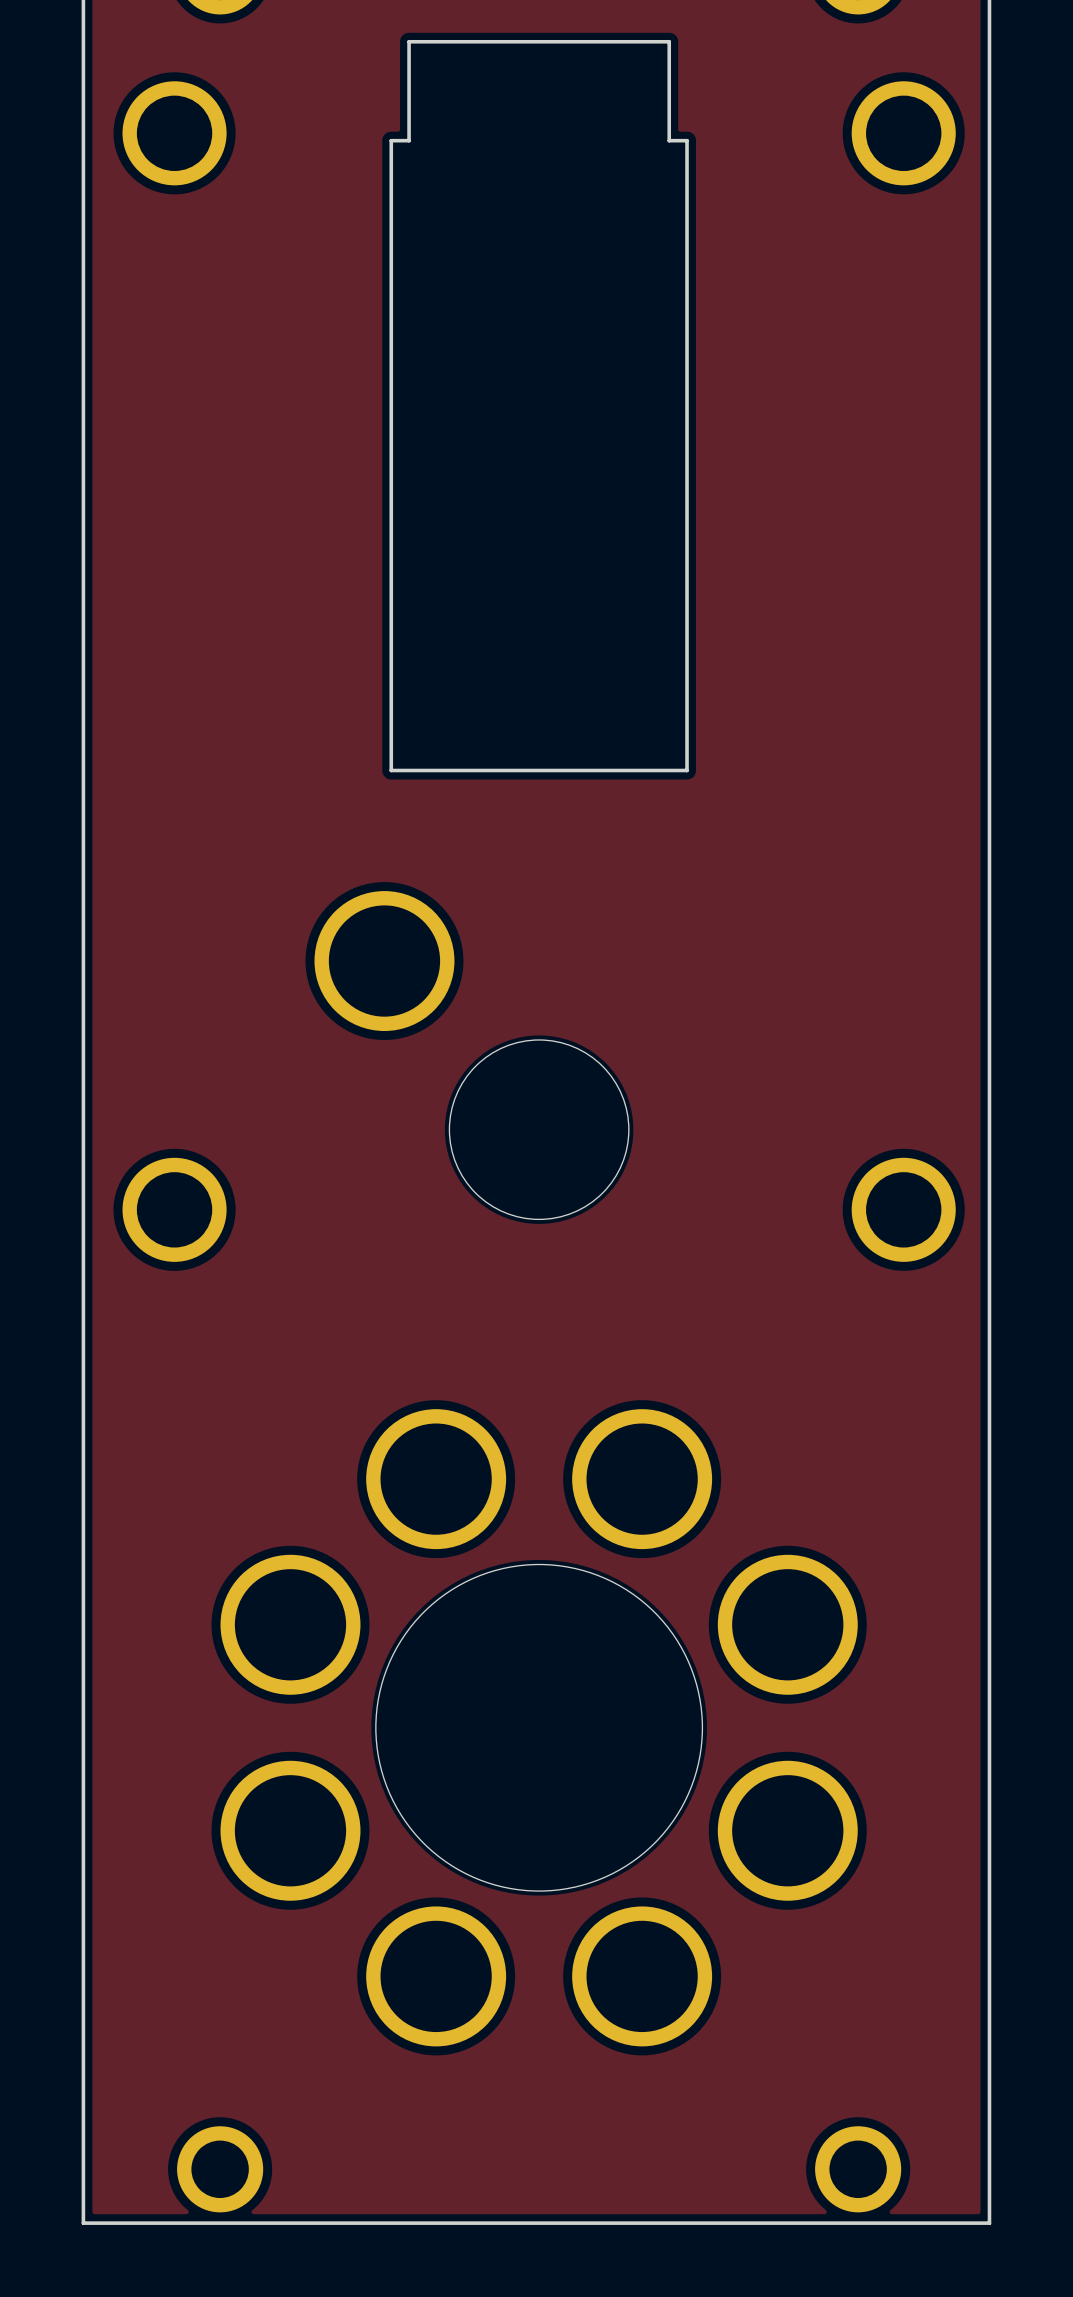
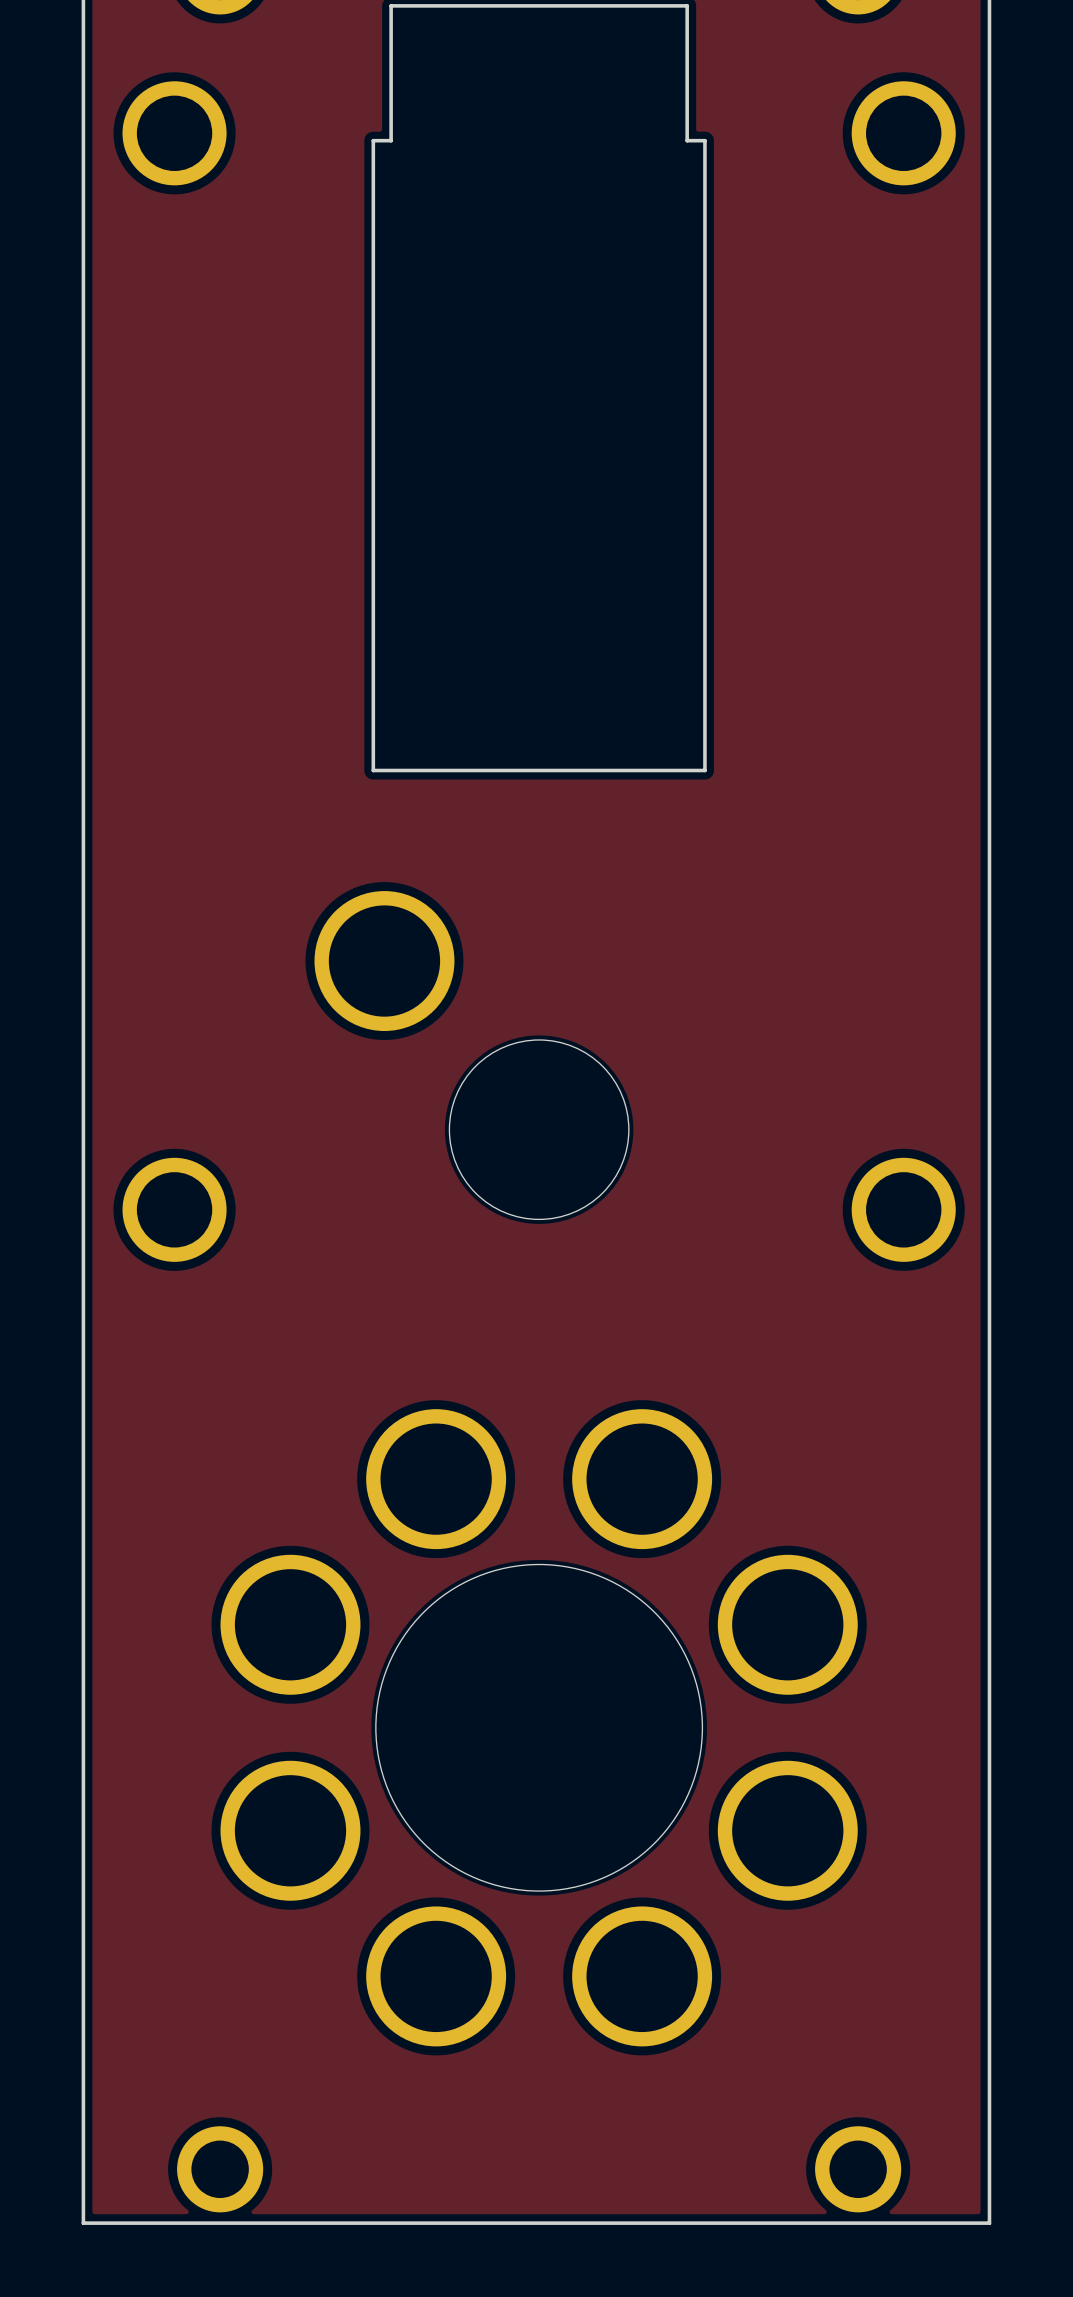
drawing: none -> [371, 4, 707, 773]
drawing: [389, 39, 689, 773] -> none

